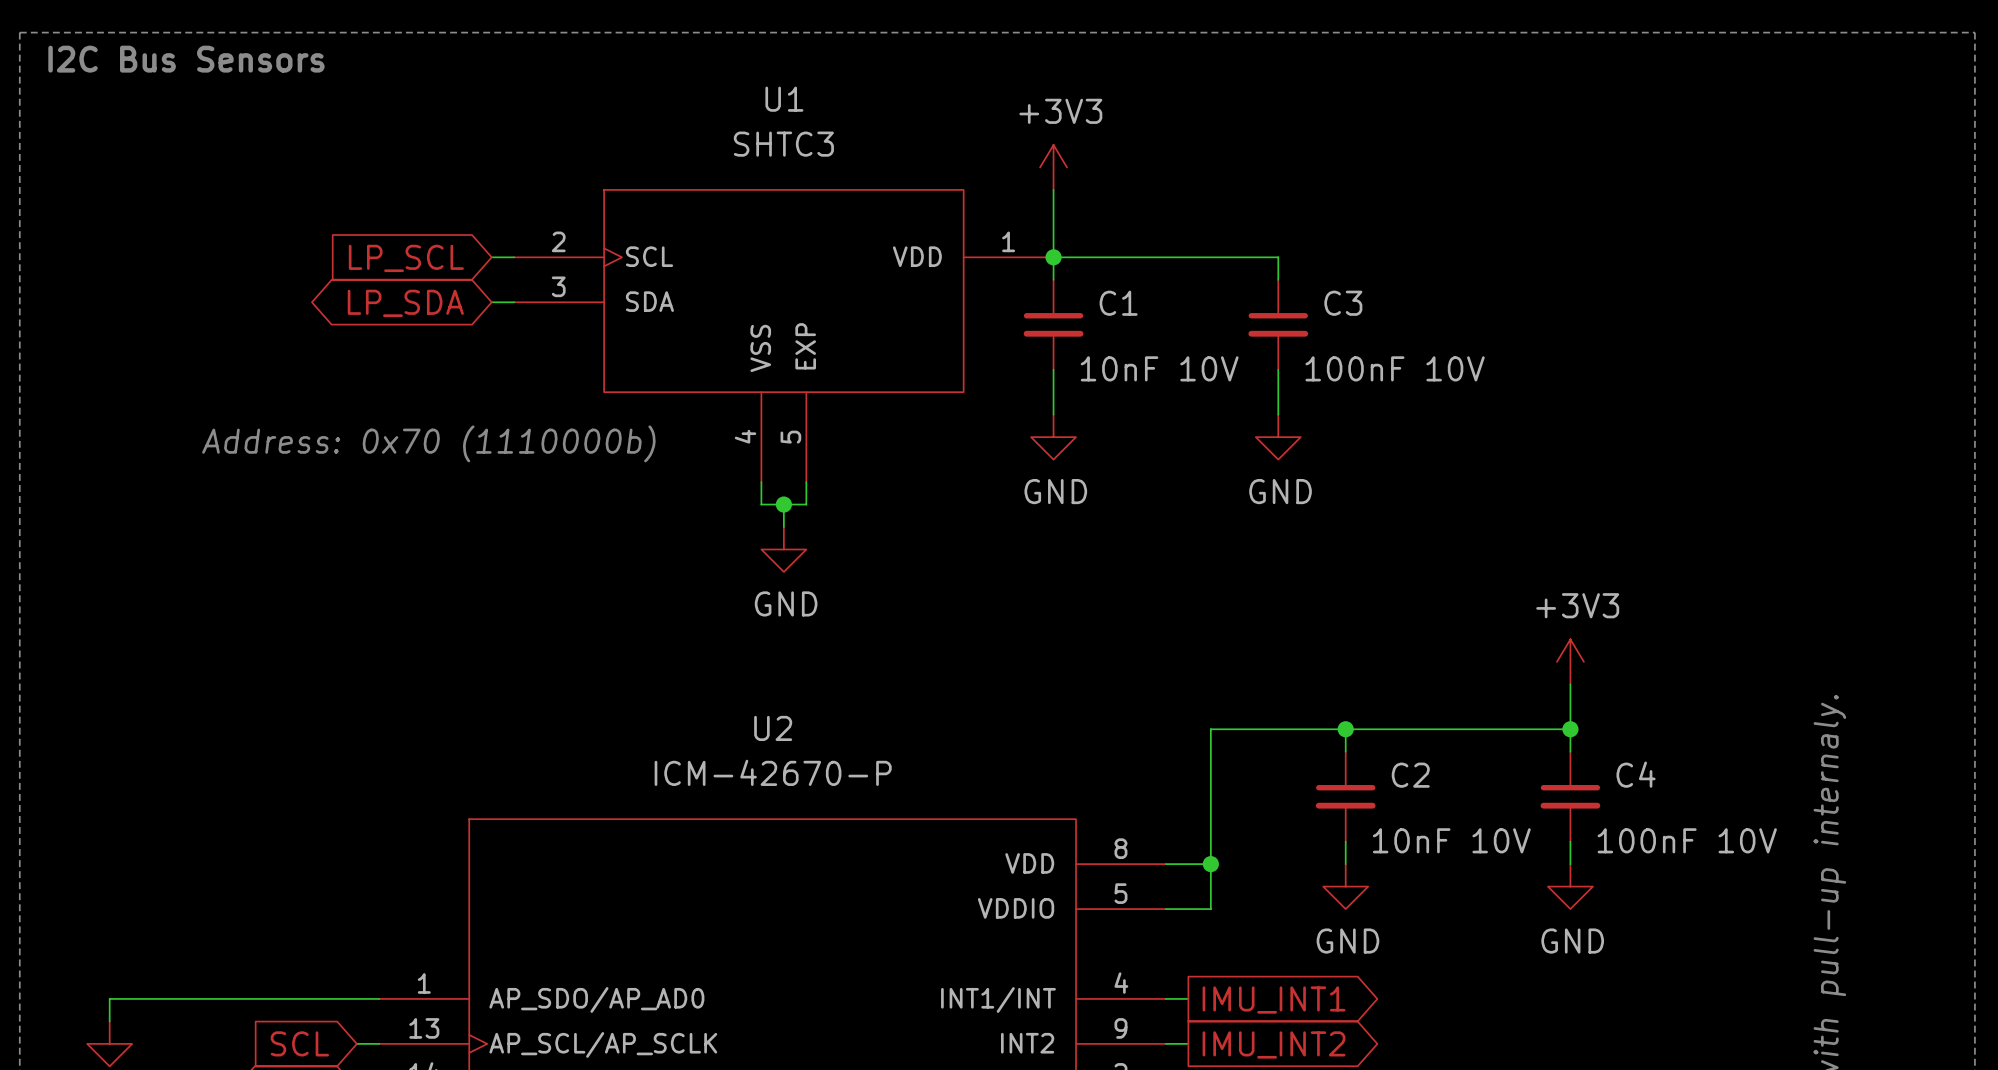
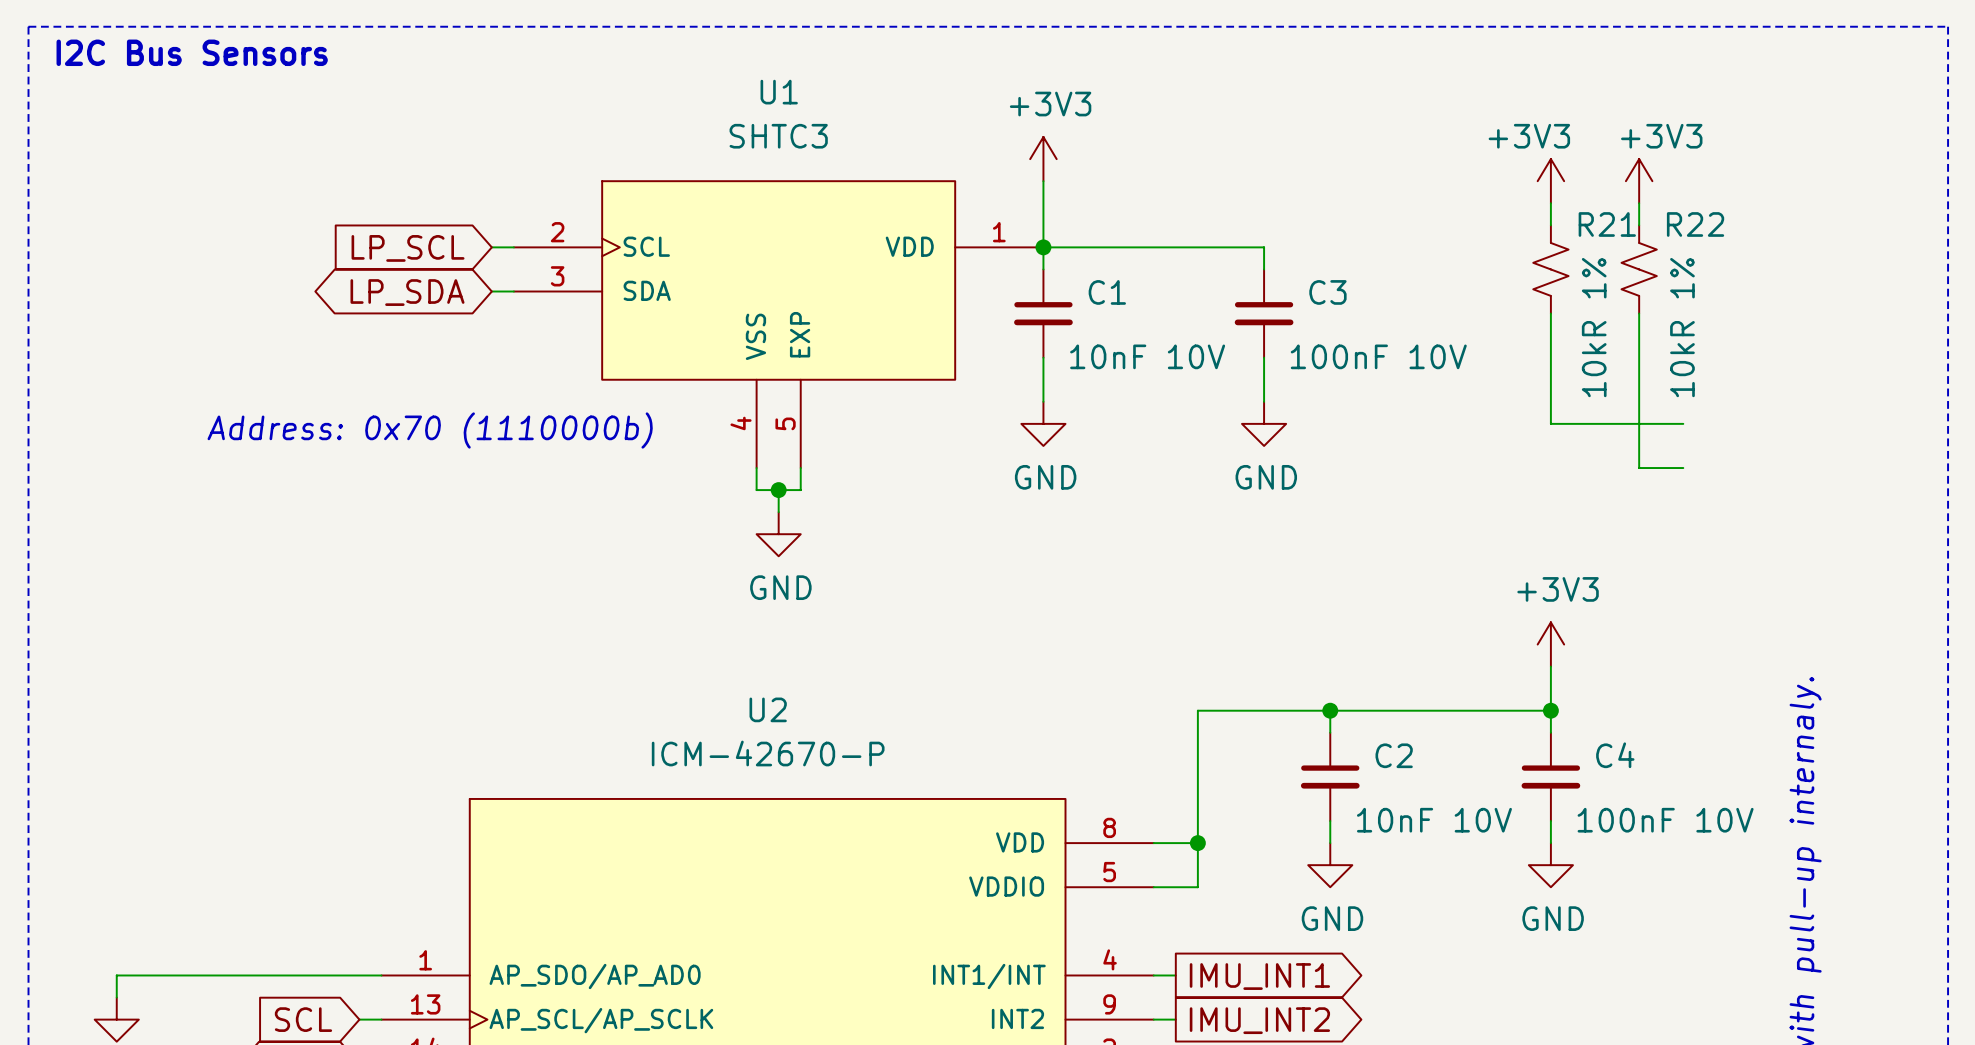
power symbol: none -> +3V3 (1550, 181)
power symbol: none -> +3V3 (1639, 181)
wire: none -> (1550, 203) (1550, 225)
wire: none -> (1639, 203) (1639, 225)
R21: none -> 10kR 1% (1550, 269)
R22: none -> 10kR 1% (1639, 269)
wire: none -> (1550, 313) (1550, 423) (1683, 423)
wire: none -> (1639, 313) (1639, 468) (1683, 468)

